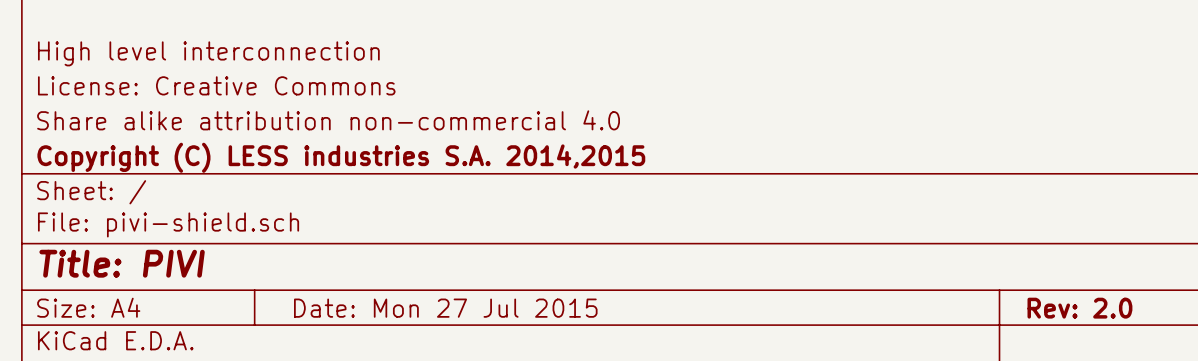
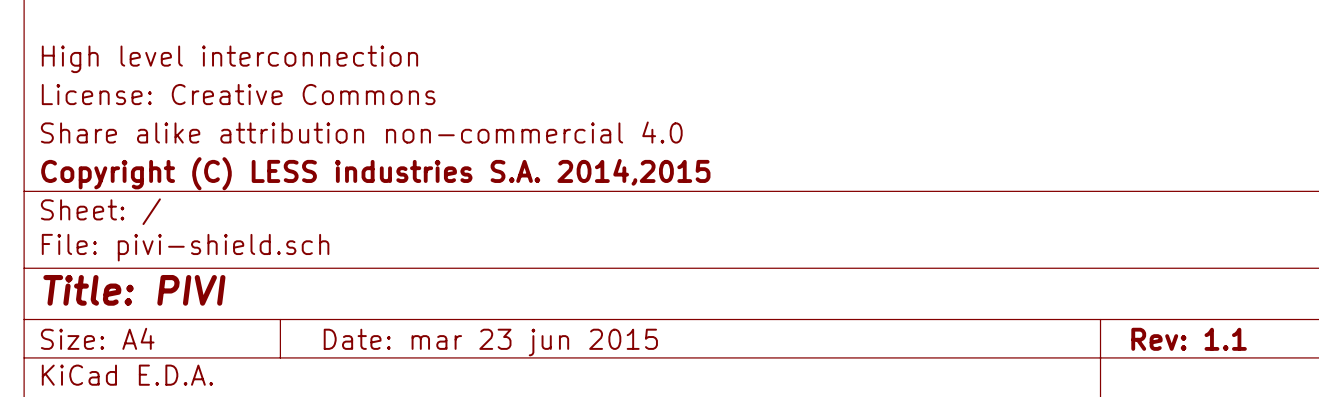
title block: Date: Mon 27 Jul 2015 (445, 308) -> Date: mar 23 jun 2015 (490, 342)
title block: Rev: 2.0 (1079, 308) -> Rev: 1.1 (1189, 339)

